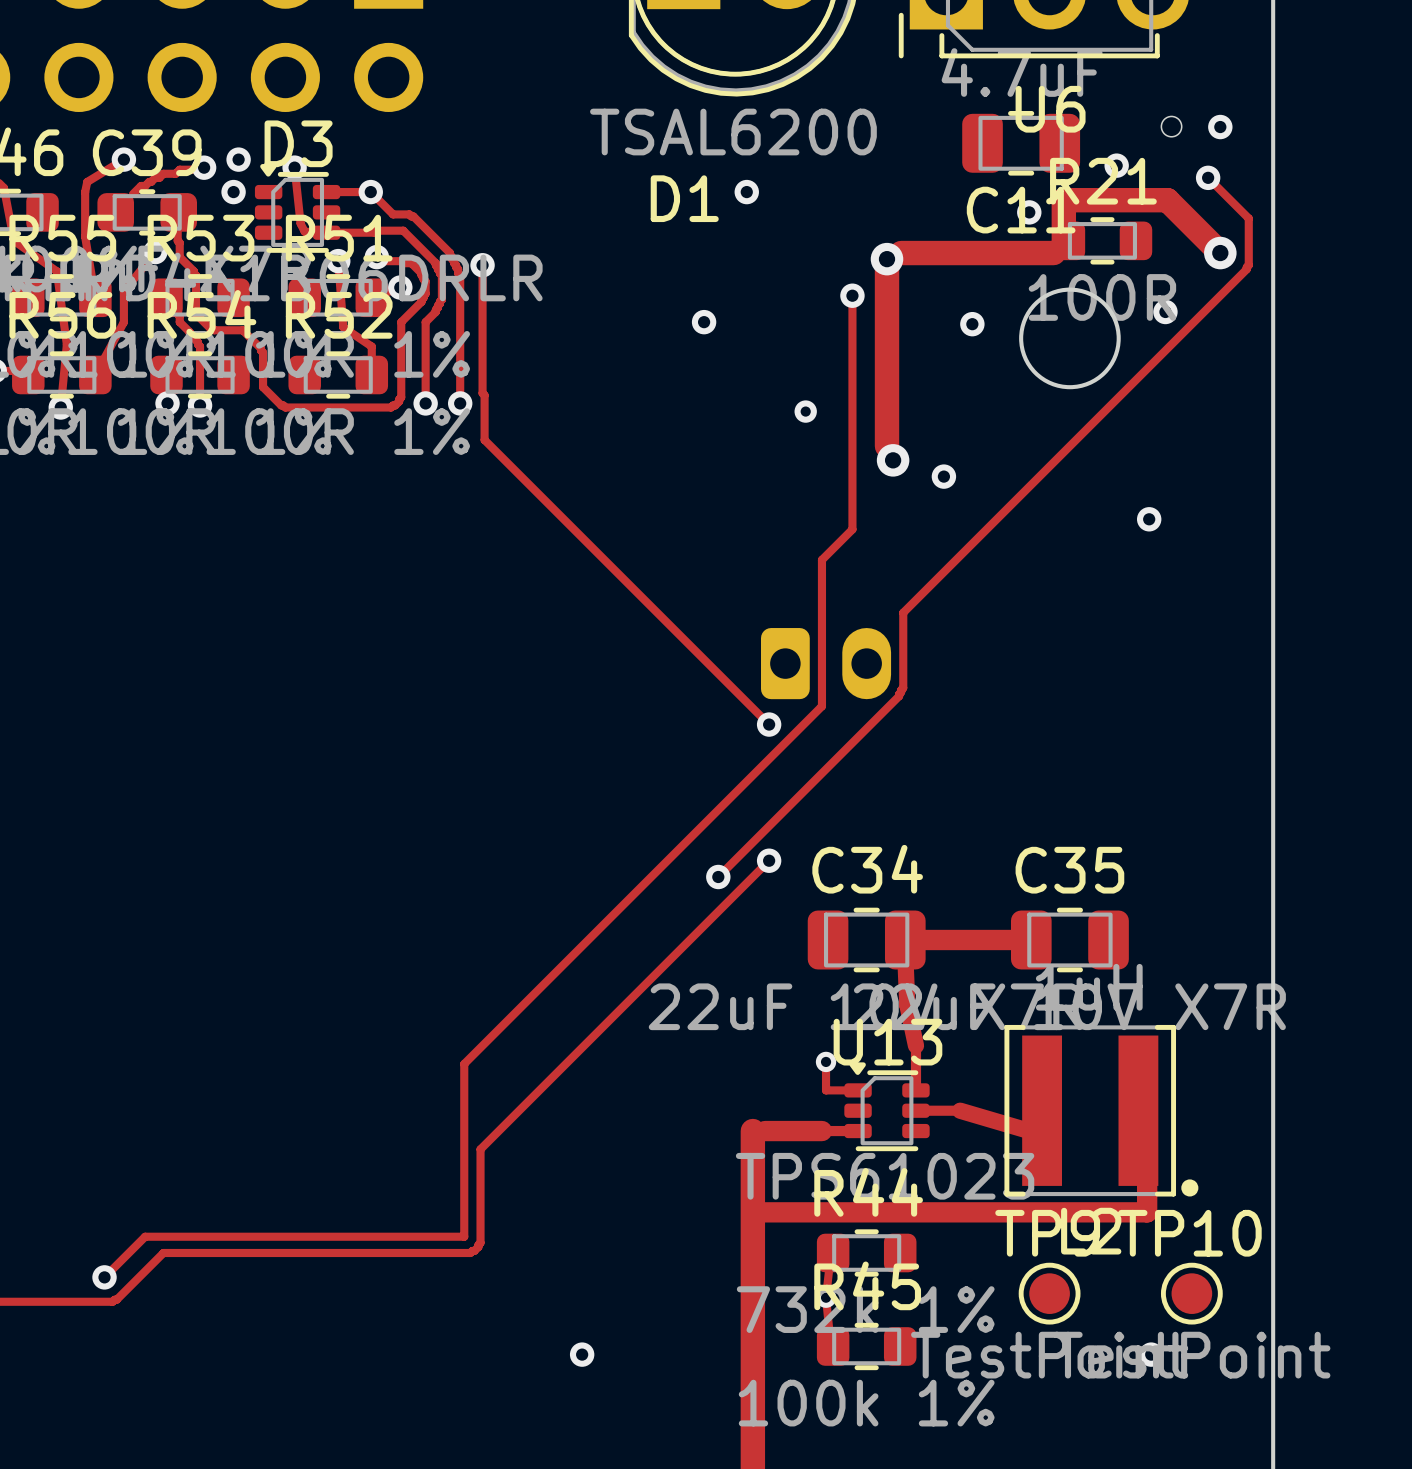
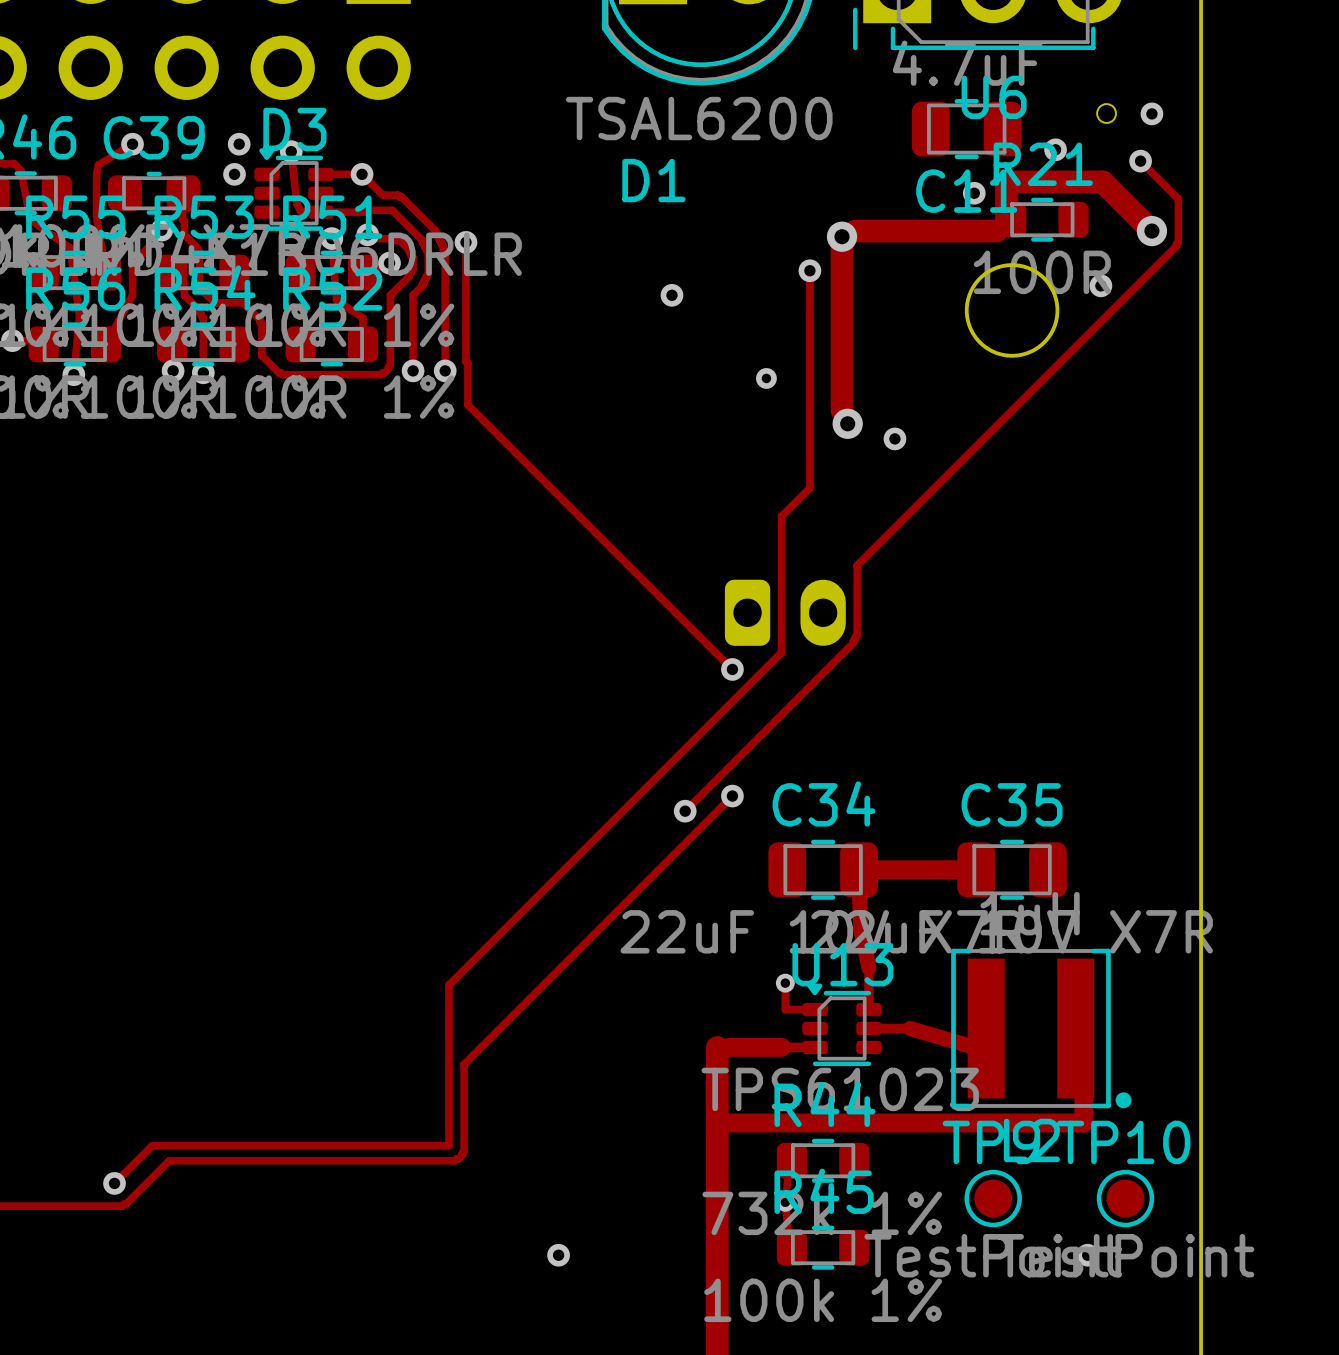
track: (204, 167) (202, 169) (179, 169) (175, 173) (163, 173) (145, 185) (141, 185) (132, 194) -> none
via: (204, 167) -> none
via: (746, 192) -> none
via: (972, 324) -> none
via: (1149, 519) -> none

